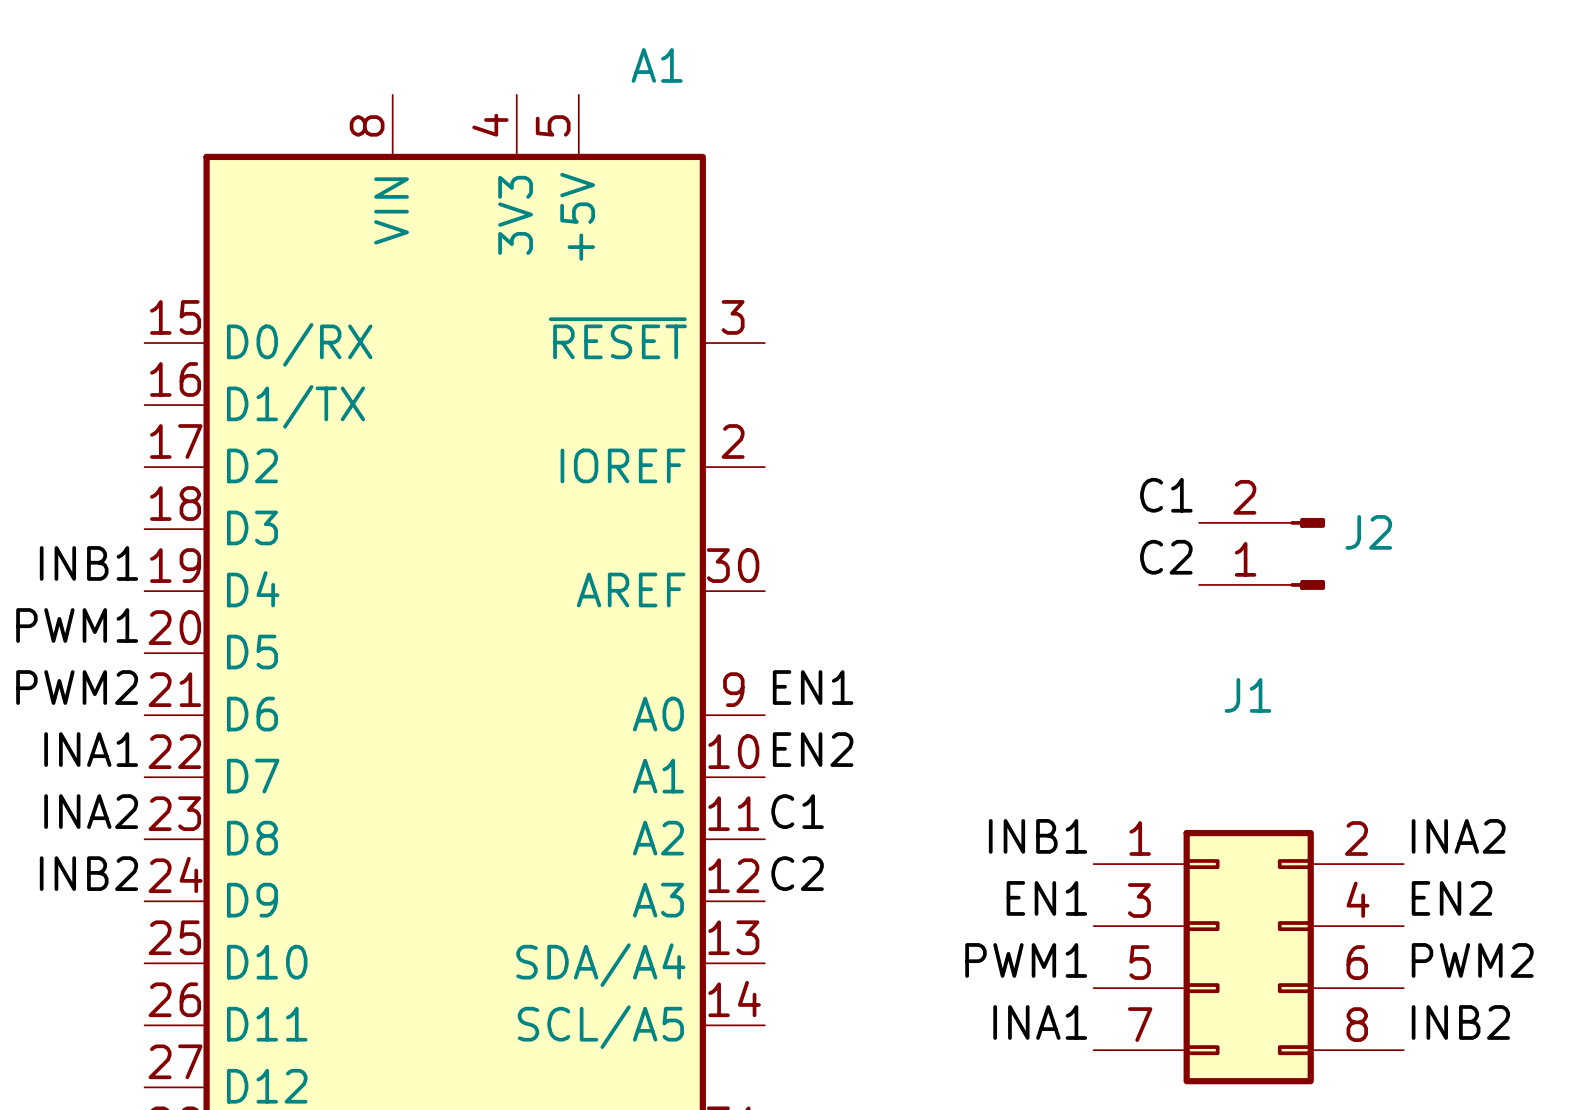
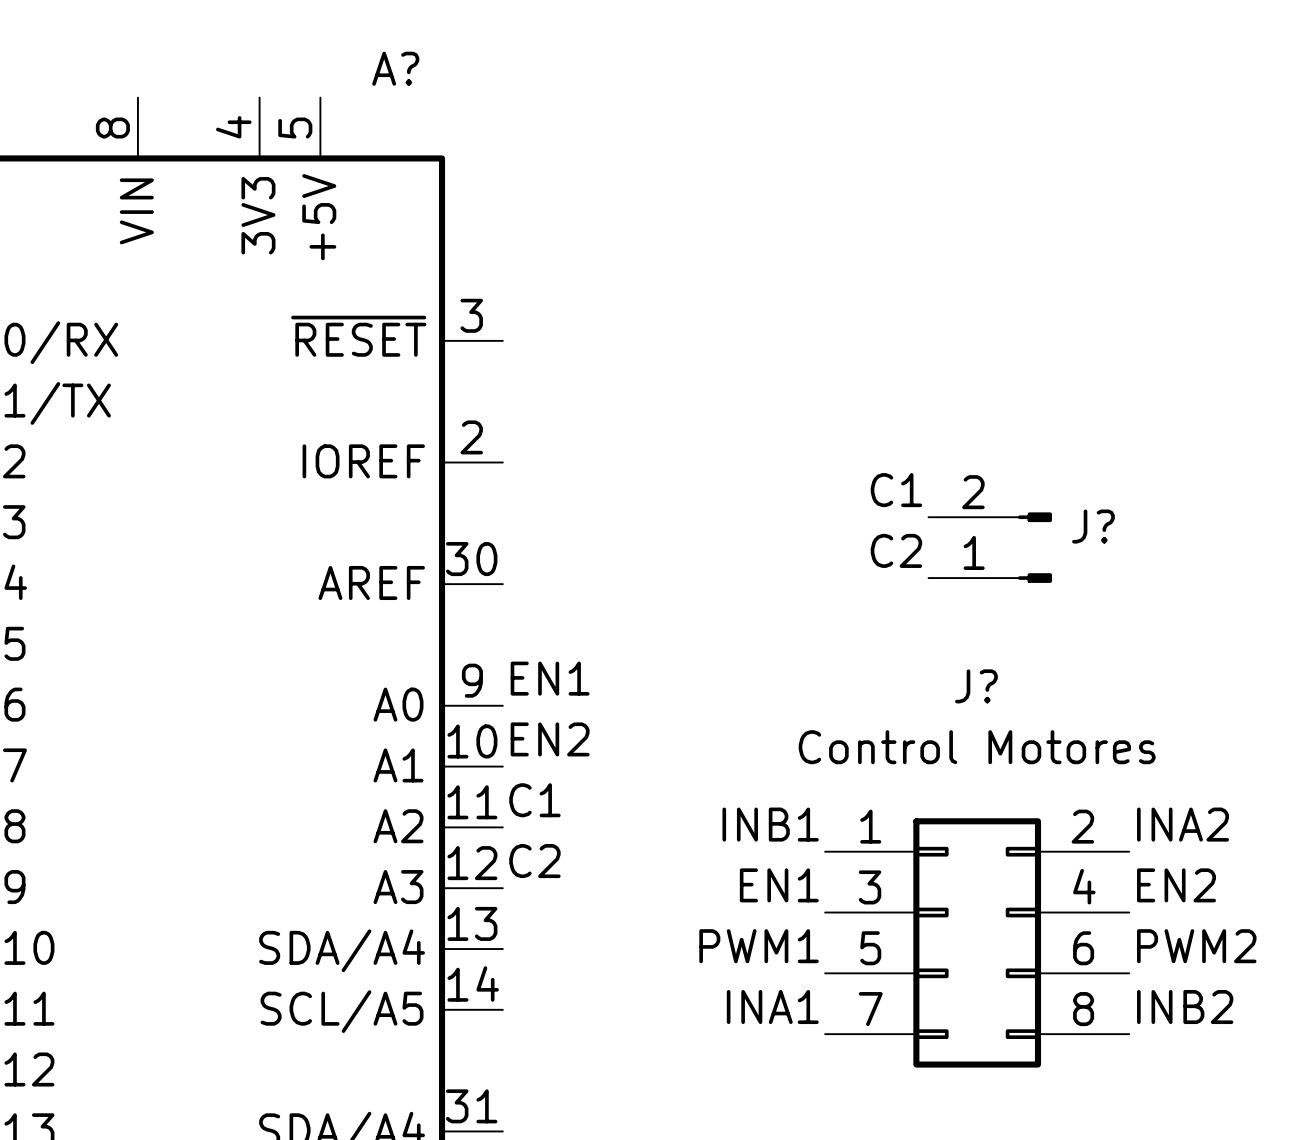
A1 name: A1 (657, 65) -> A? (395, 68)
J2 name: J2 (1368, 532) -> J? (1093, 526)
J1 name: J1 (1247, 695) -> J? (976, 686)
J1 value: none -> Control Motores (977, 747)

